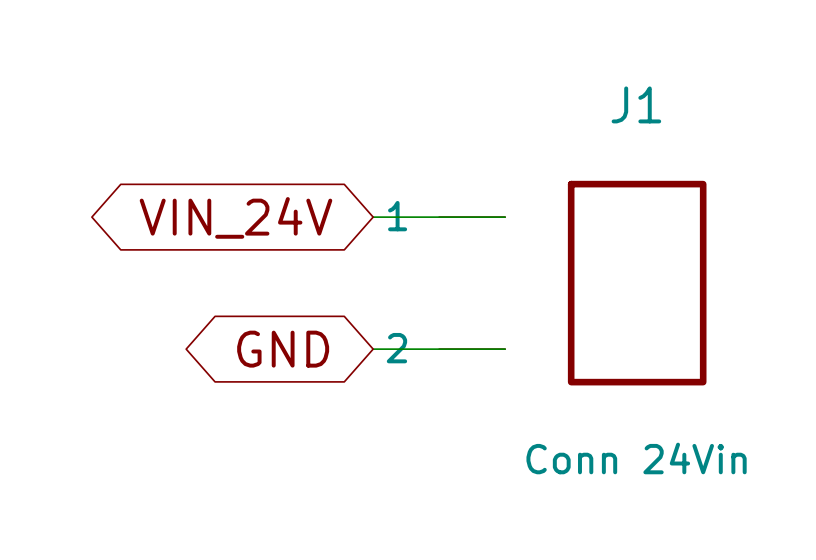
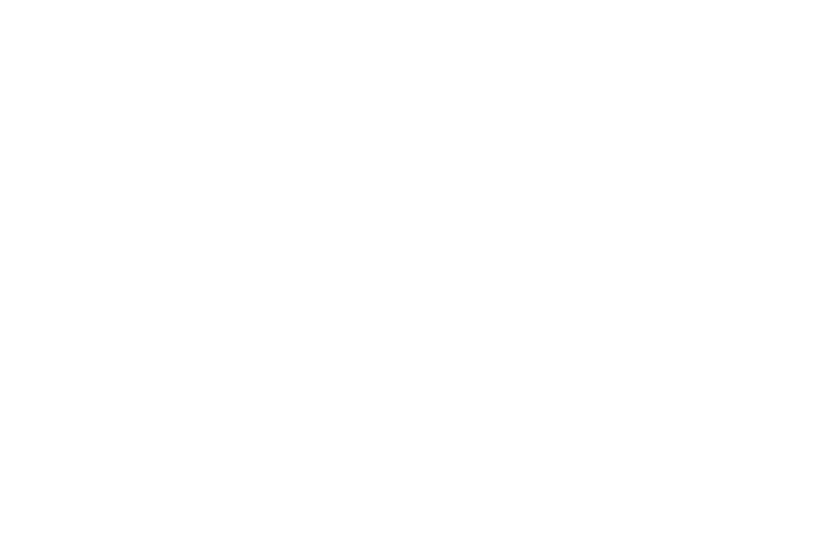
global label: VIN_24V (235, 217) -> none
wire: (373, 217) (505, 217) -> none
J1: Conn 24Vin (572, 283) -> none
global label: GND (283, 349) -> none
wire: (373, 349) (505, 349) -> none

